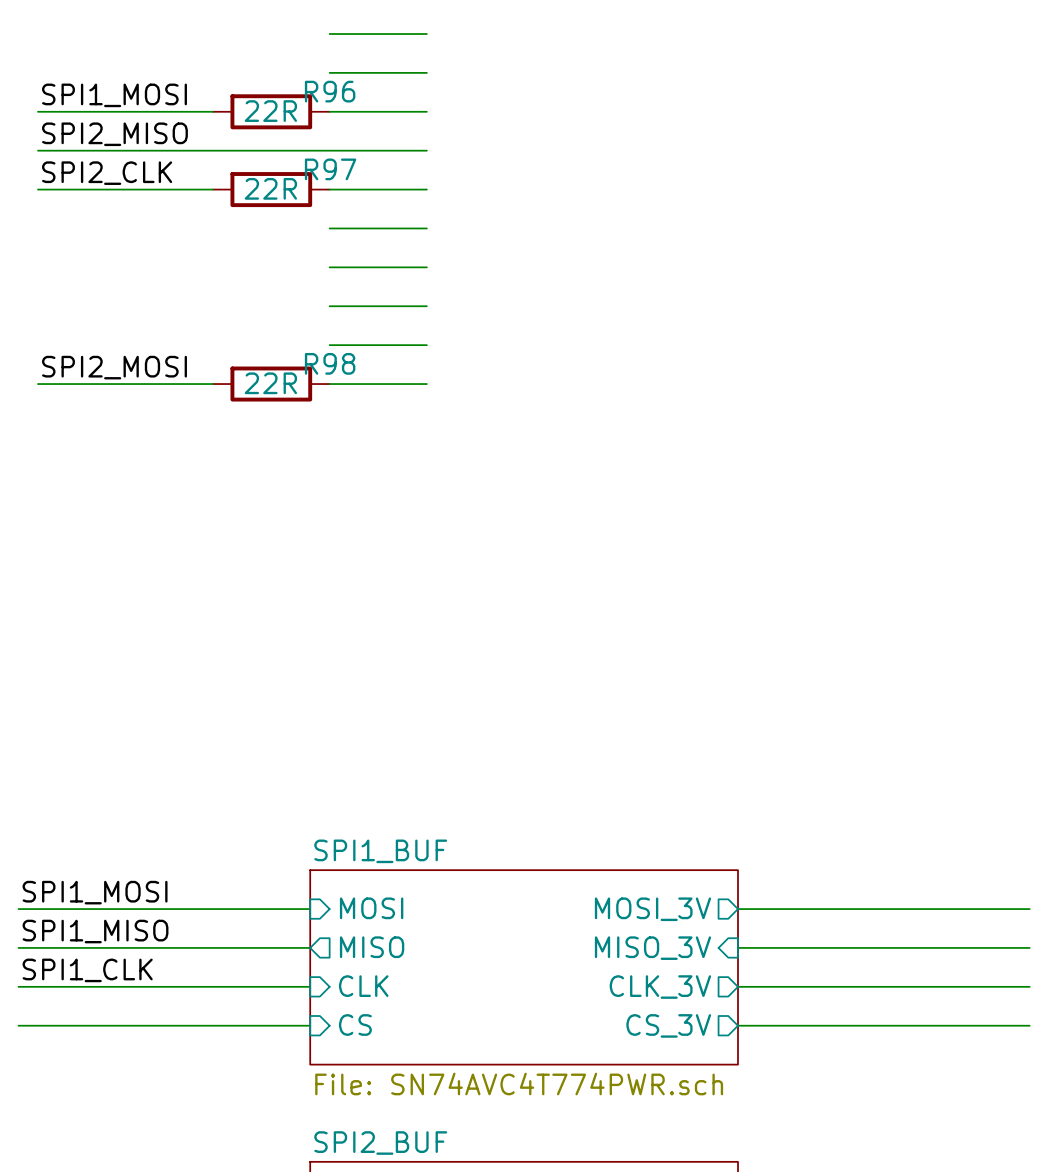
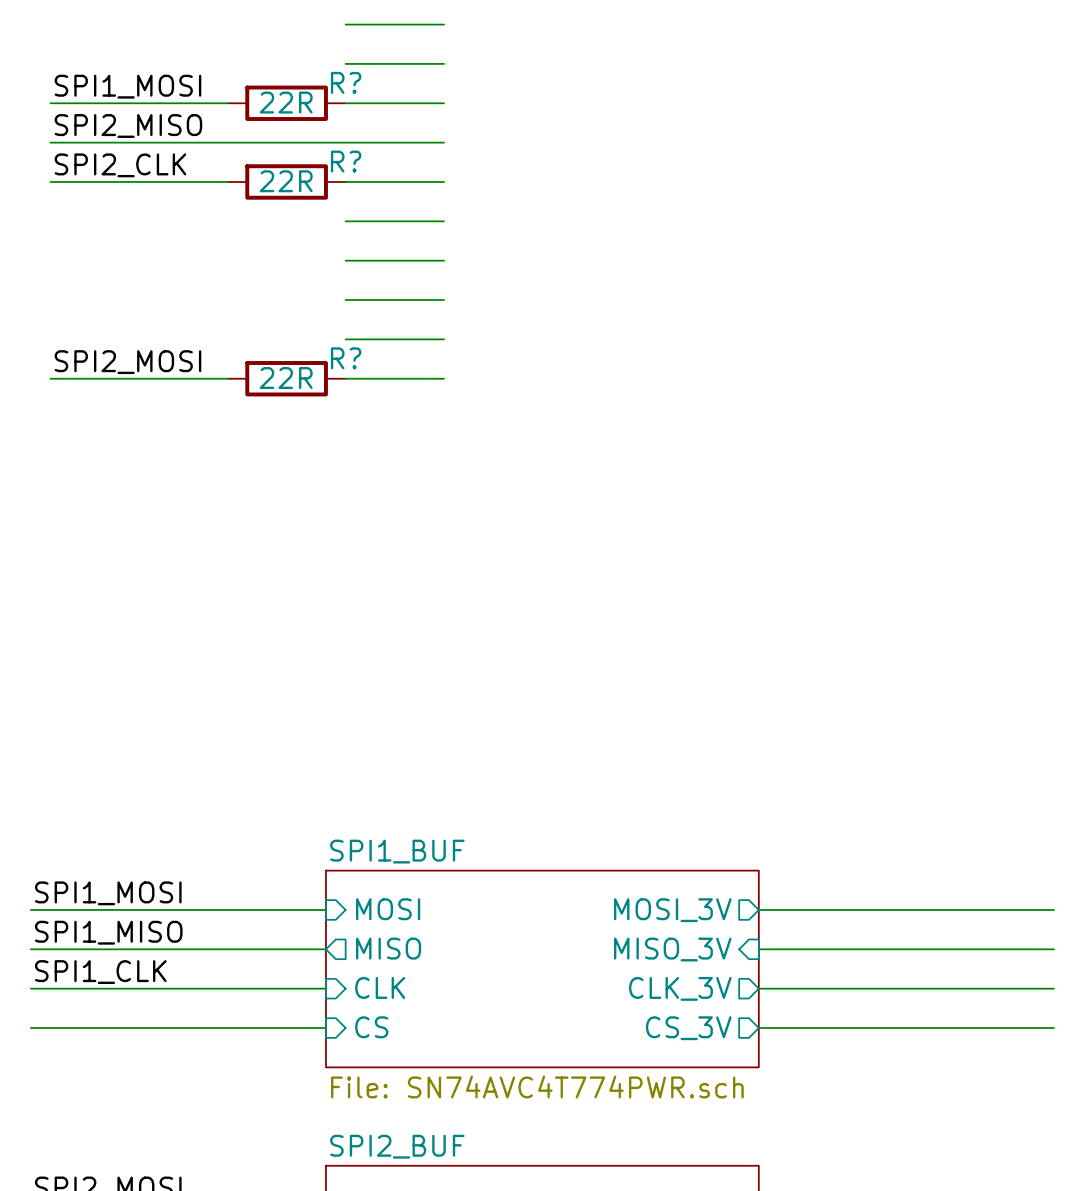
R96 name: R96 (330, 91) -> R? (346, 82)
R97 name: R97 (330, 169) -> R? (346, 161)
R98 name: R98 (330, 363) -> R? (346, 358)

